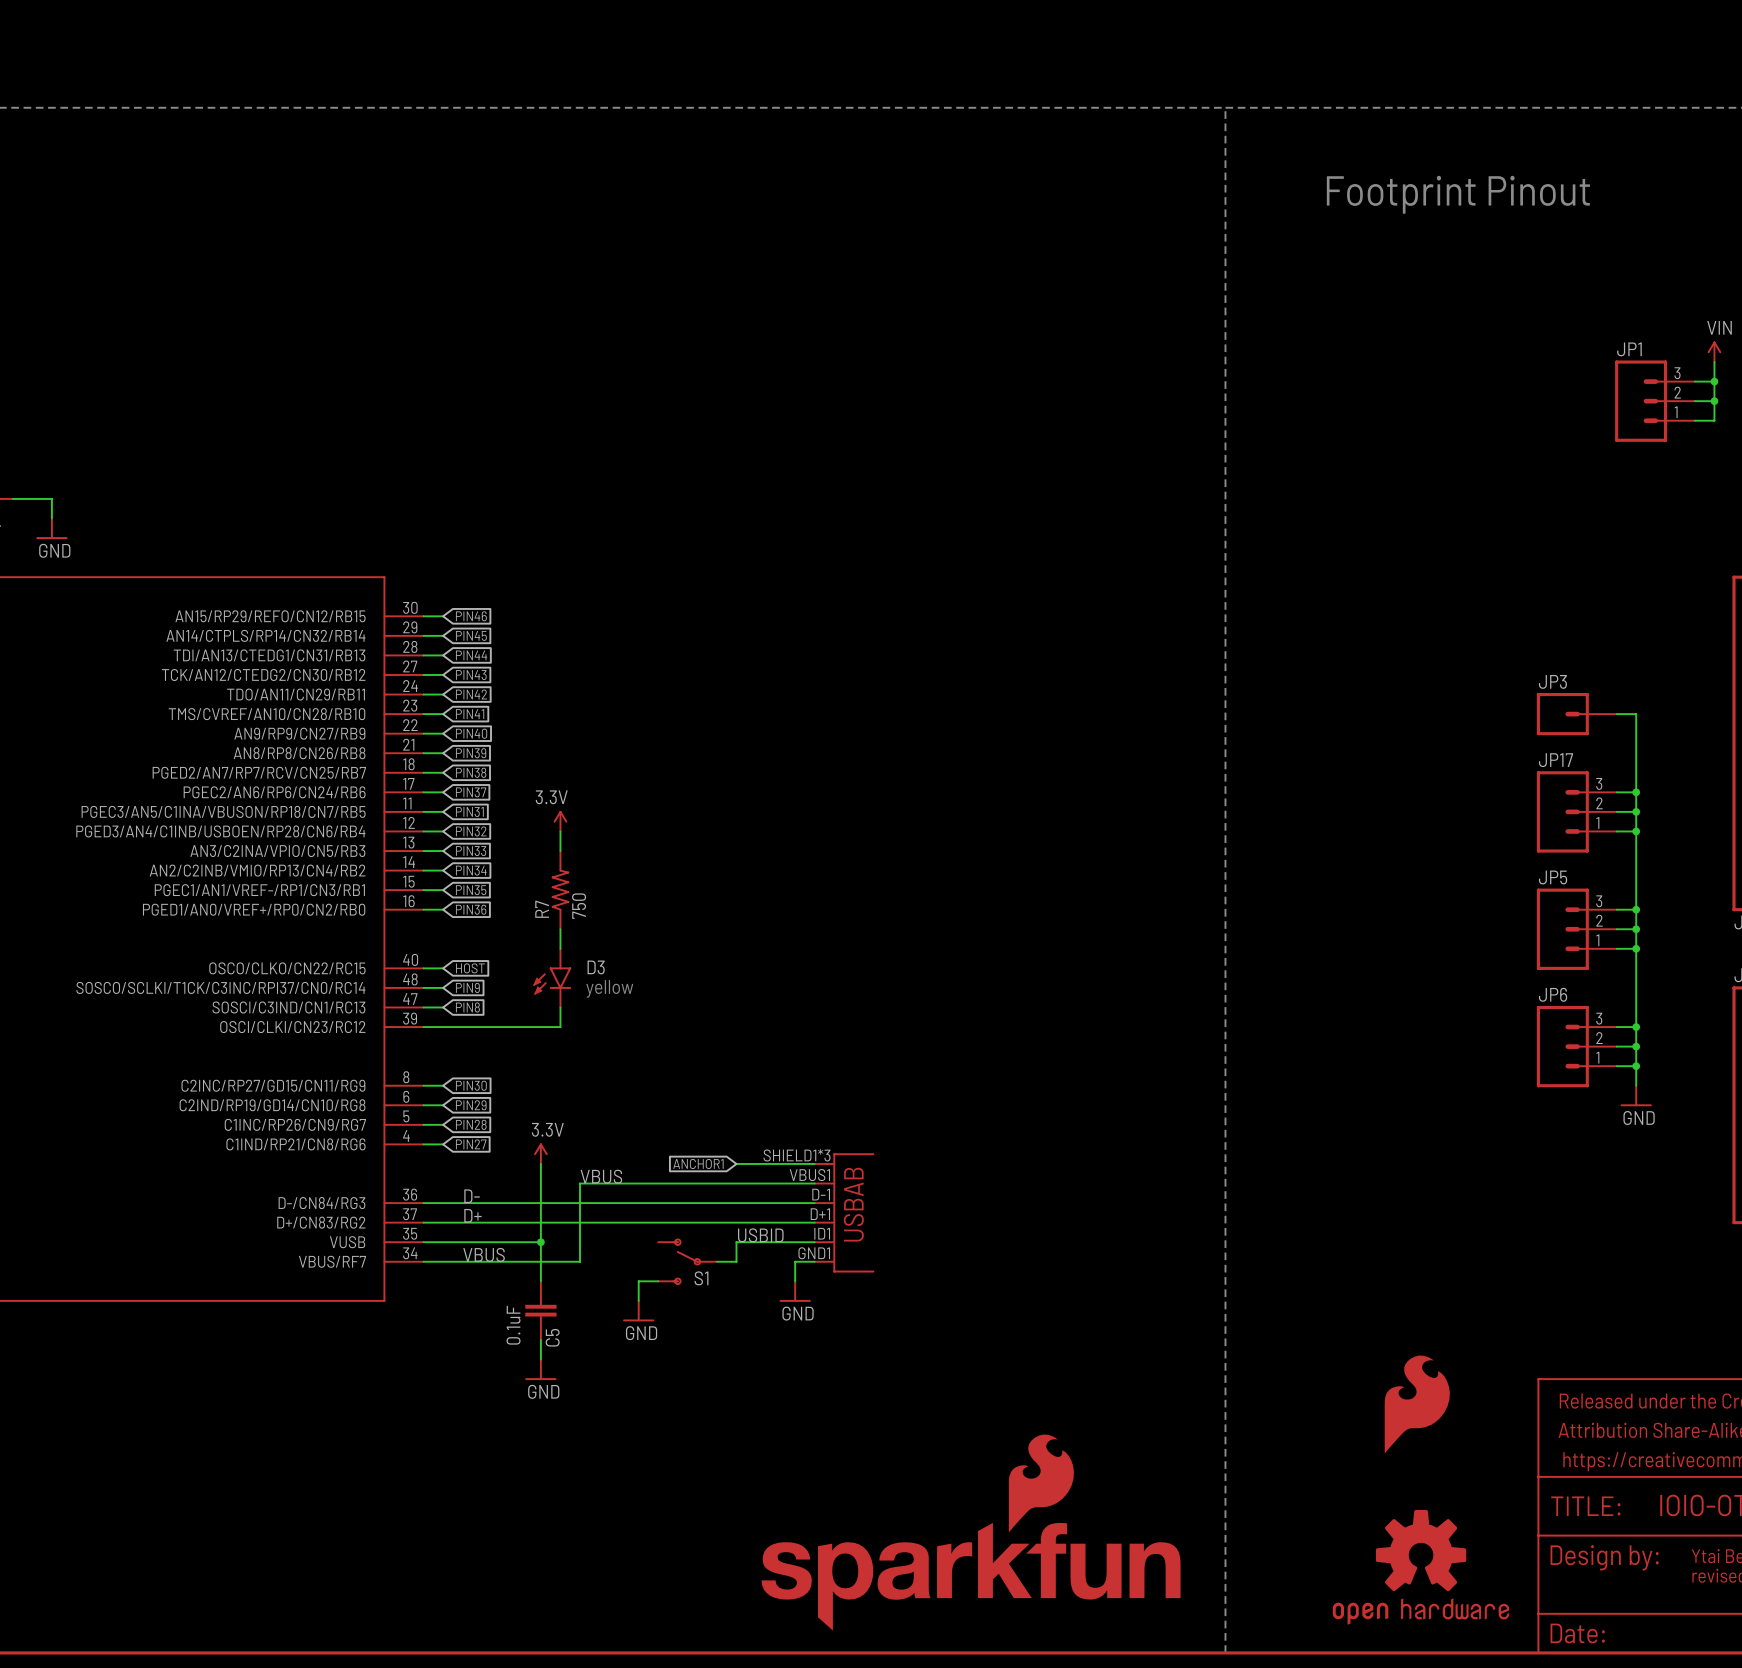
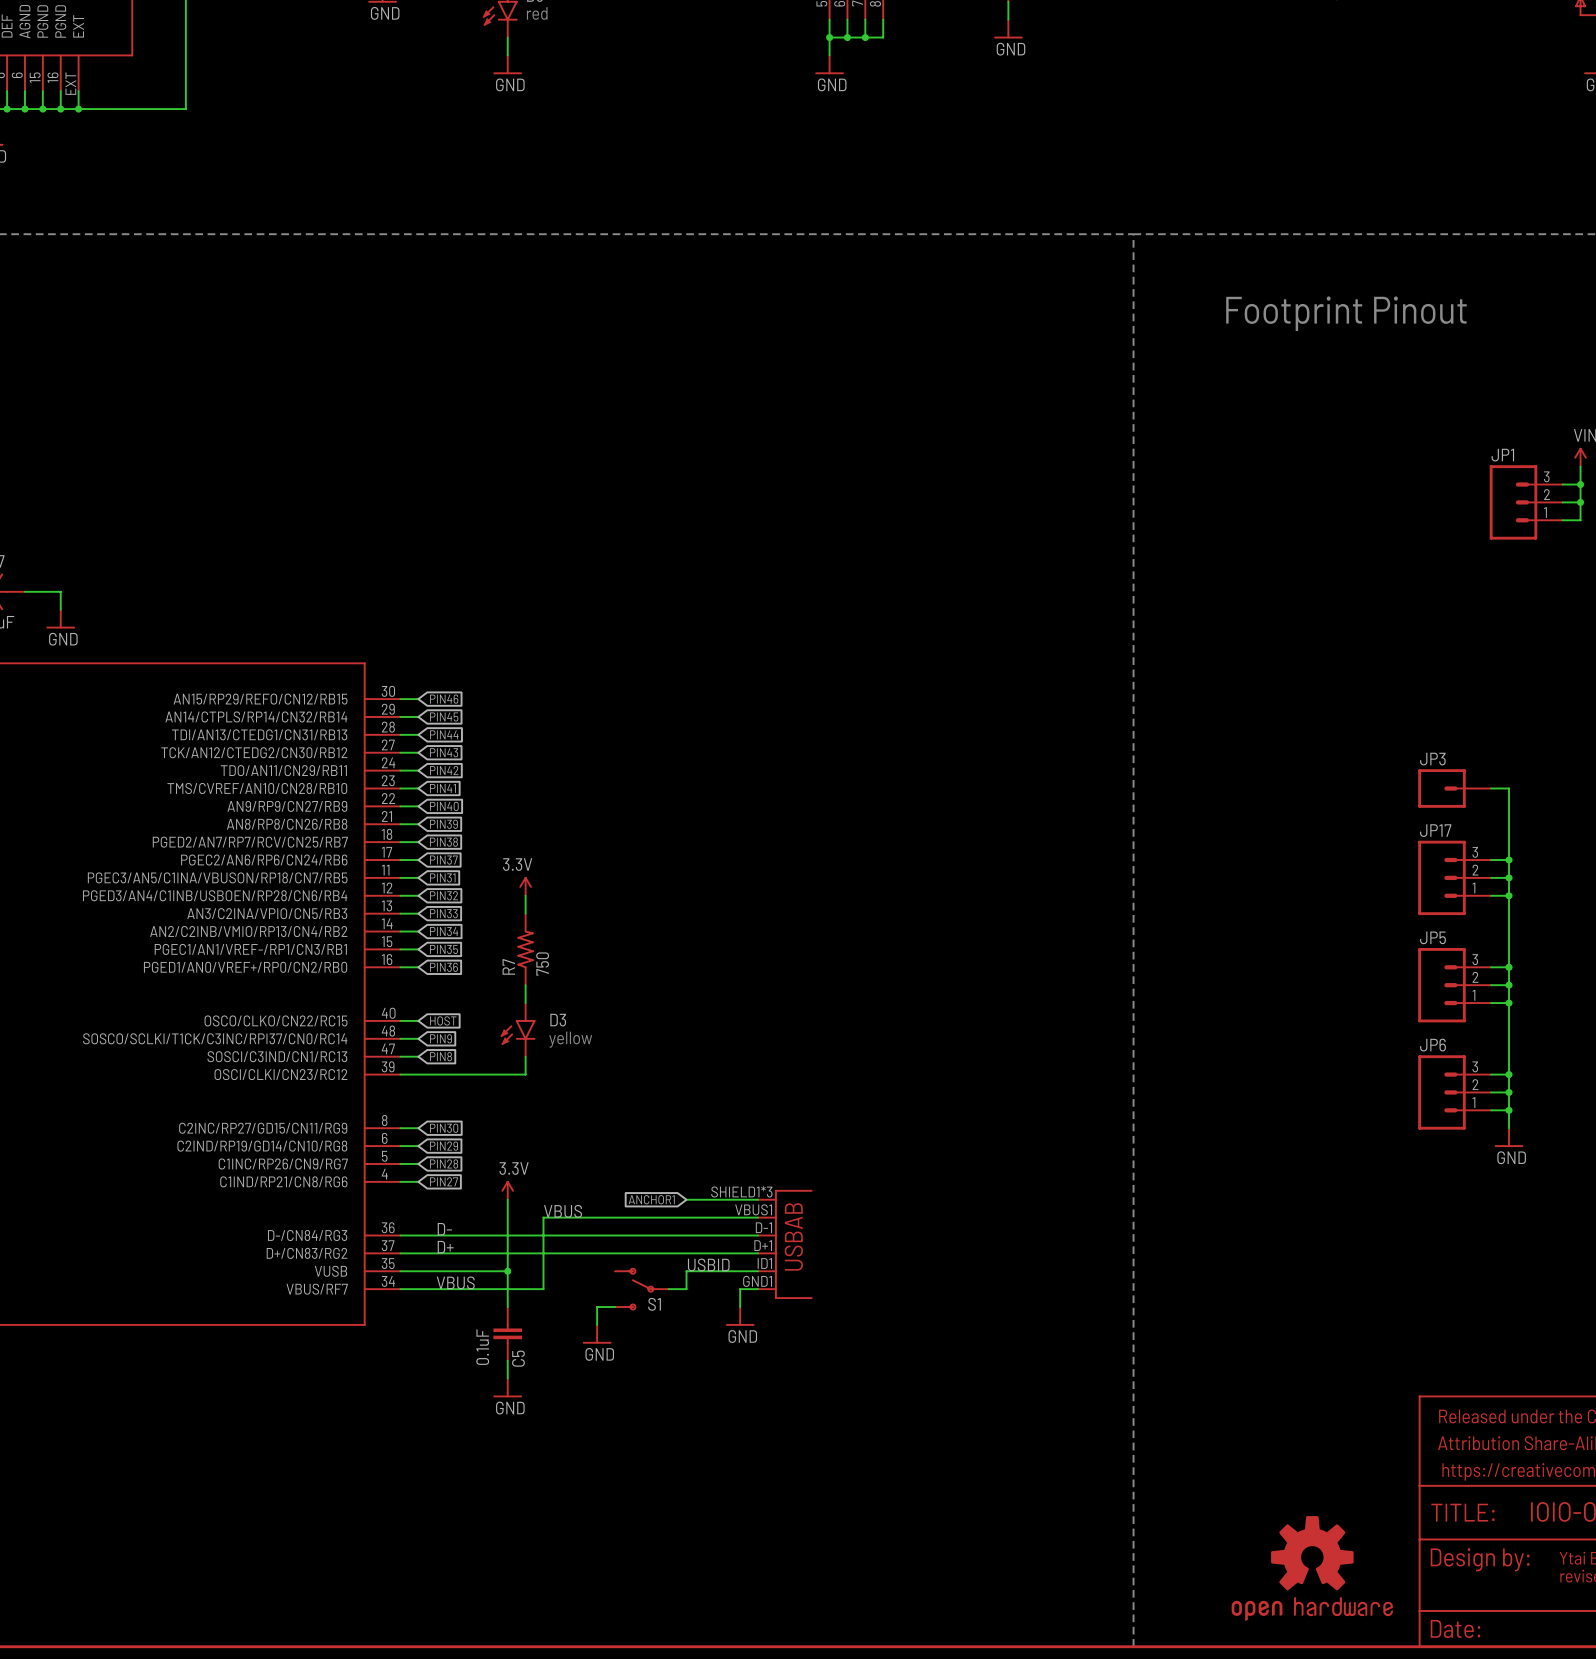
part: (1417, 1404) -> none
part: (971, 1532) -> none

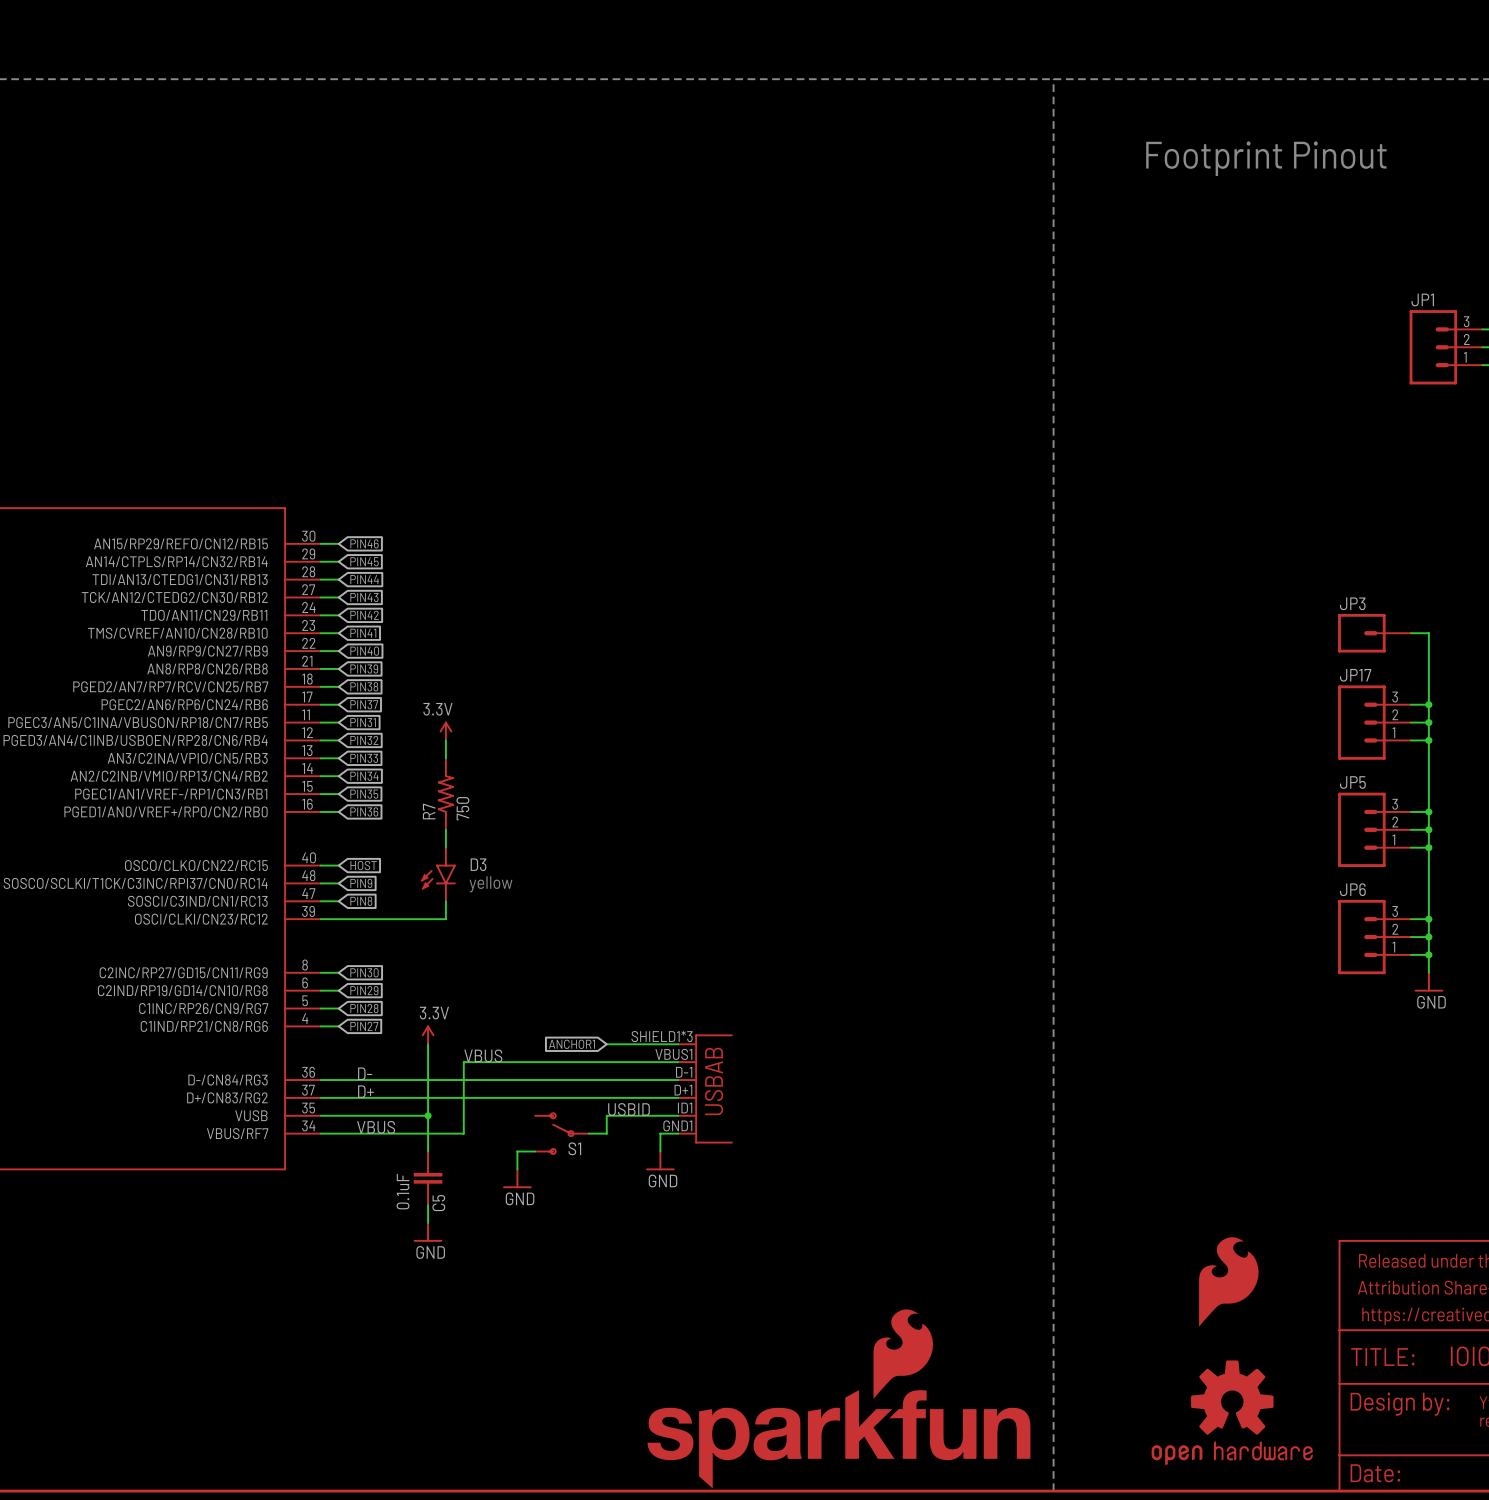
part: none -> (1228, 1281)
part: none -> (838, 1398)

